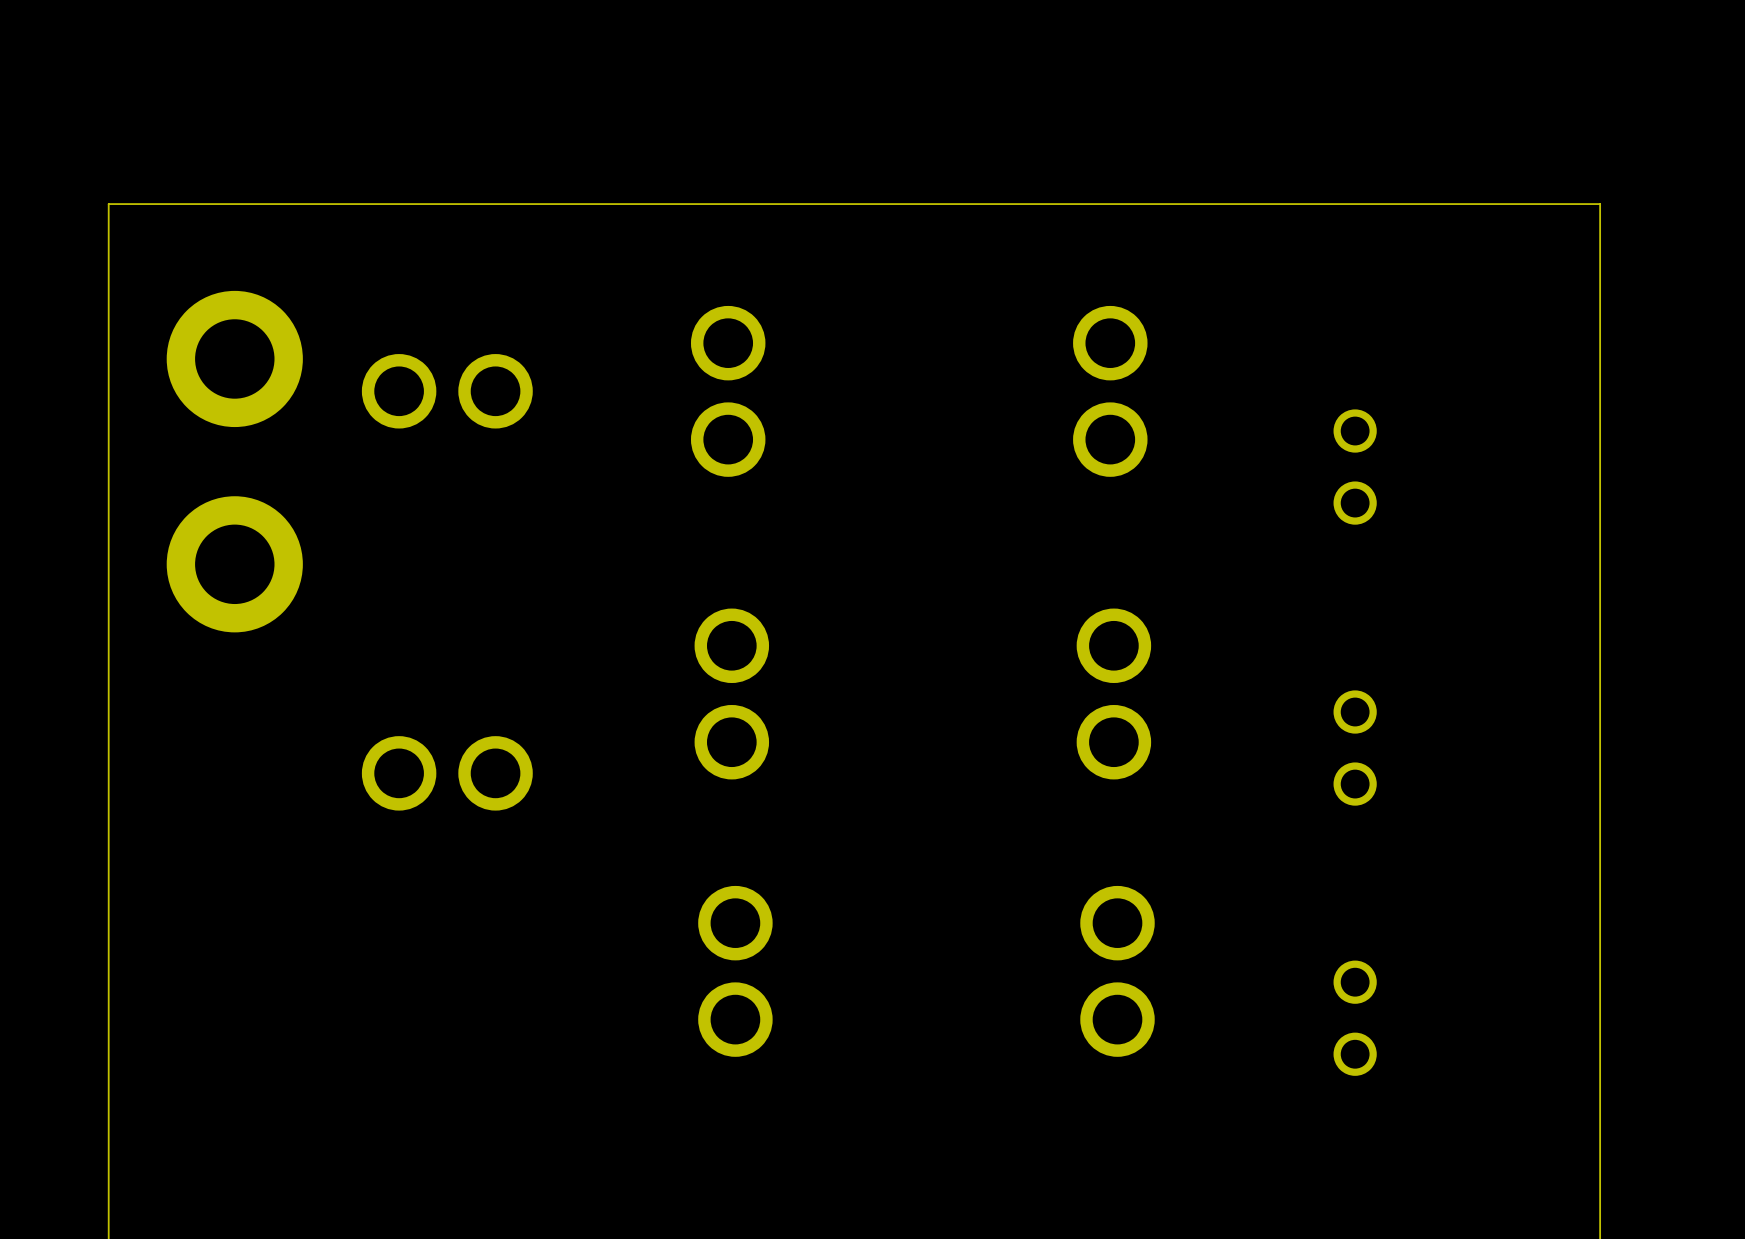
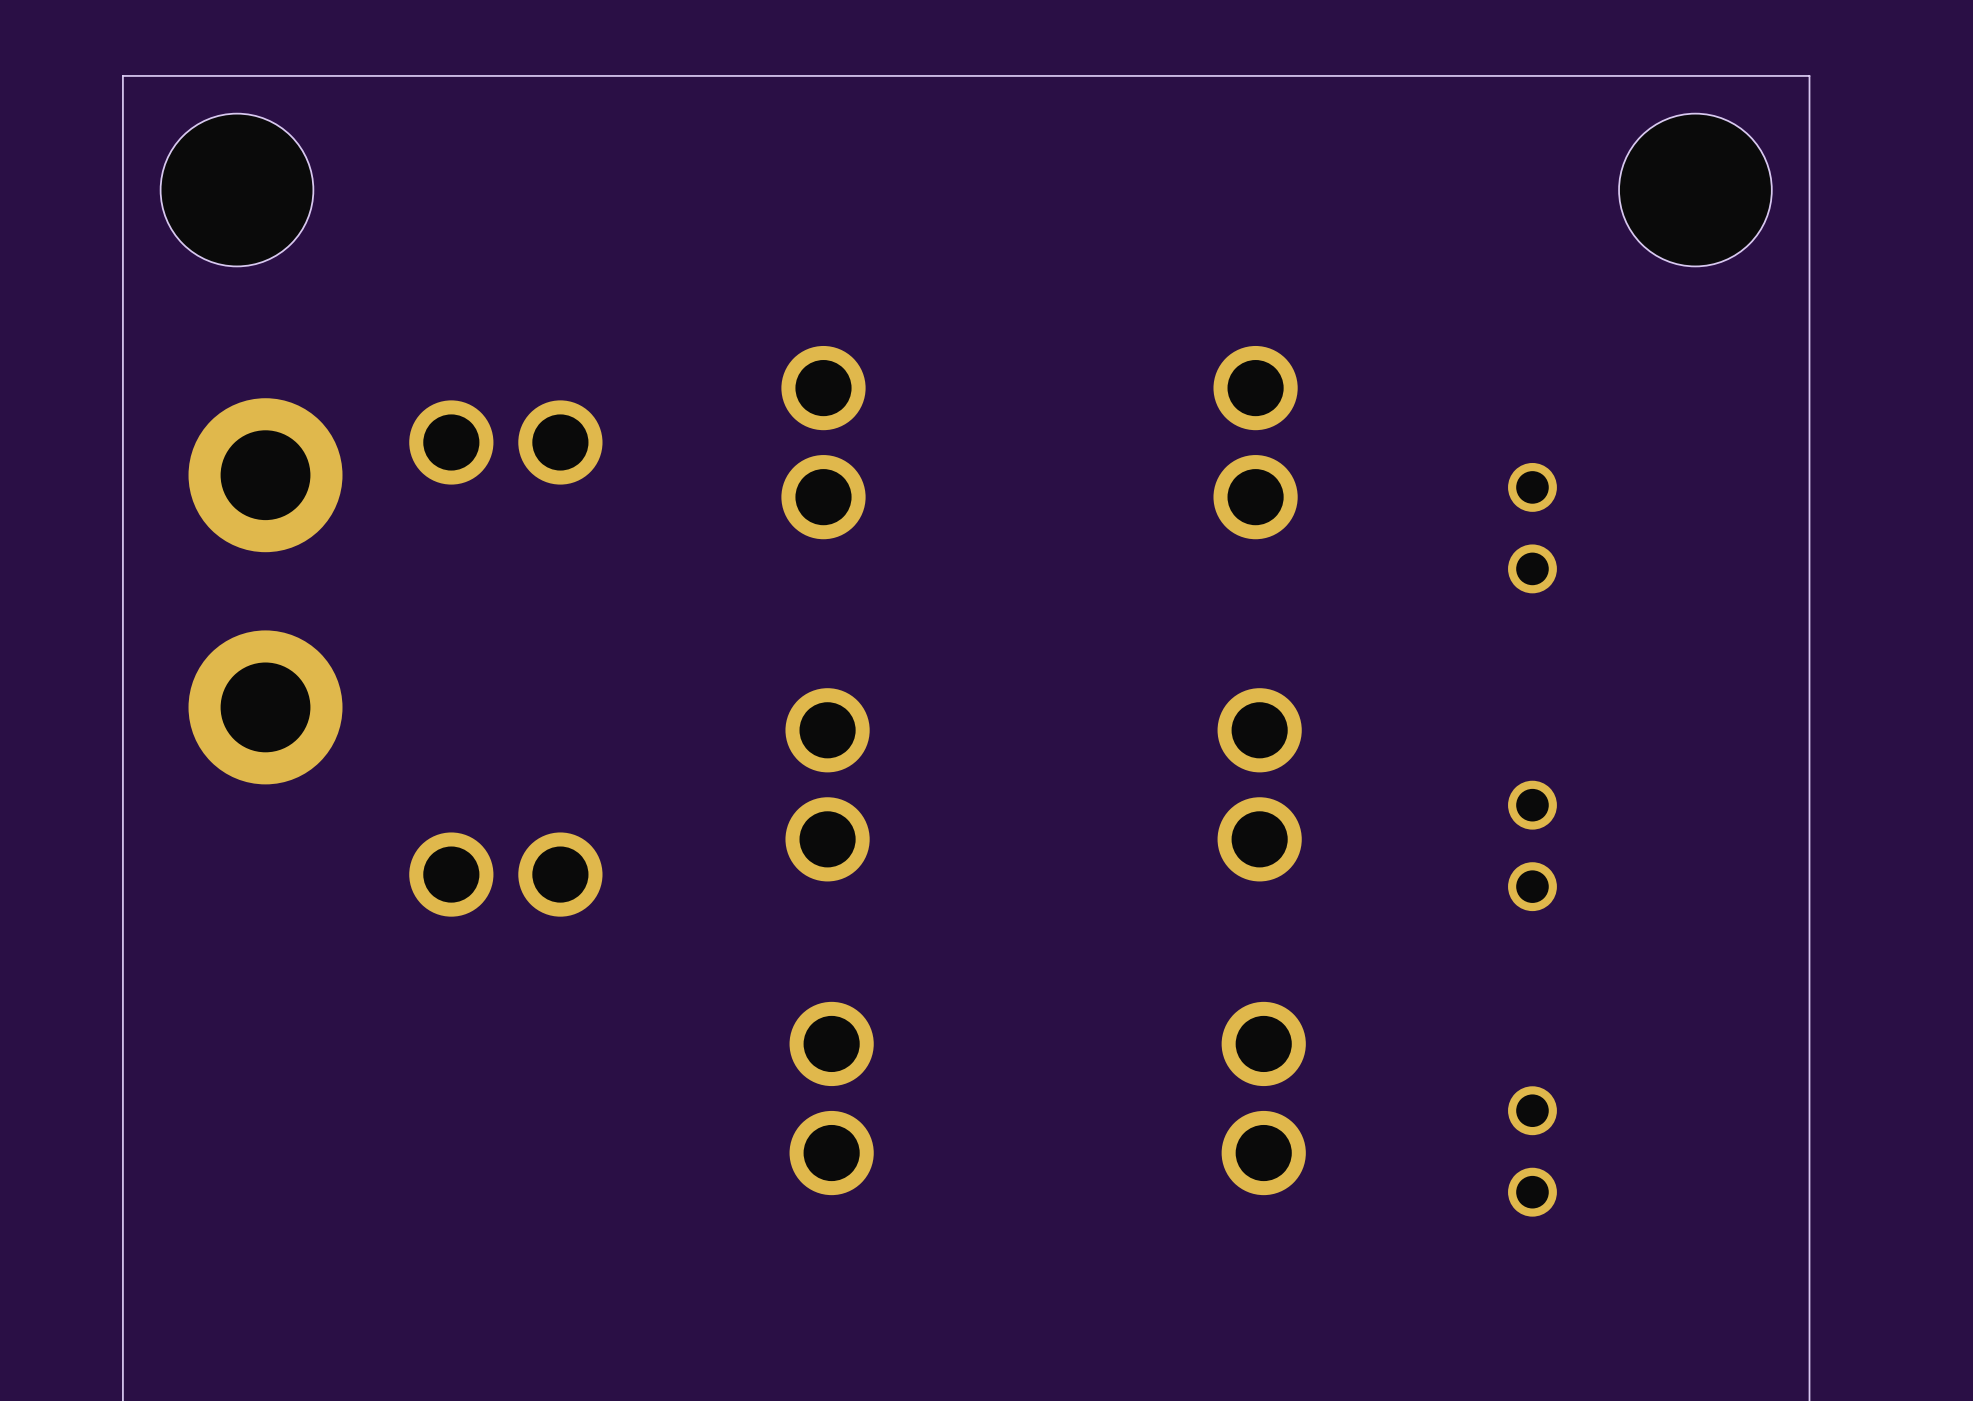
hole: none -> (236, 190)
hole: none -> (1695, 190)
board edge: (1600, 204) (108, 204) -> (1809, 230) (1809, 75) (122, 75) (122, 230)
part position: (234, 358) -> (265, 475)
part position: (234, 564) -> (265, 707)

